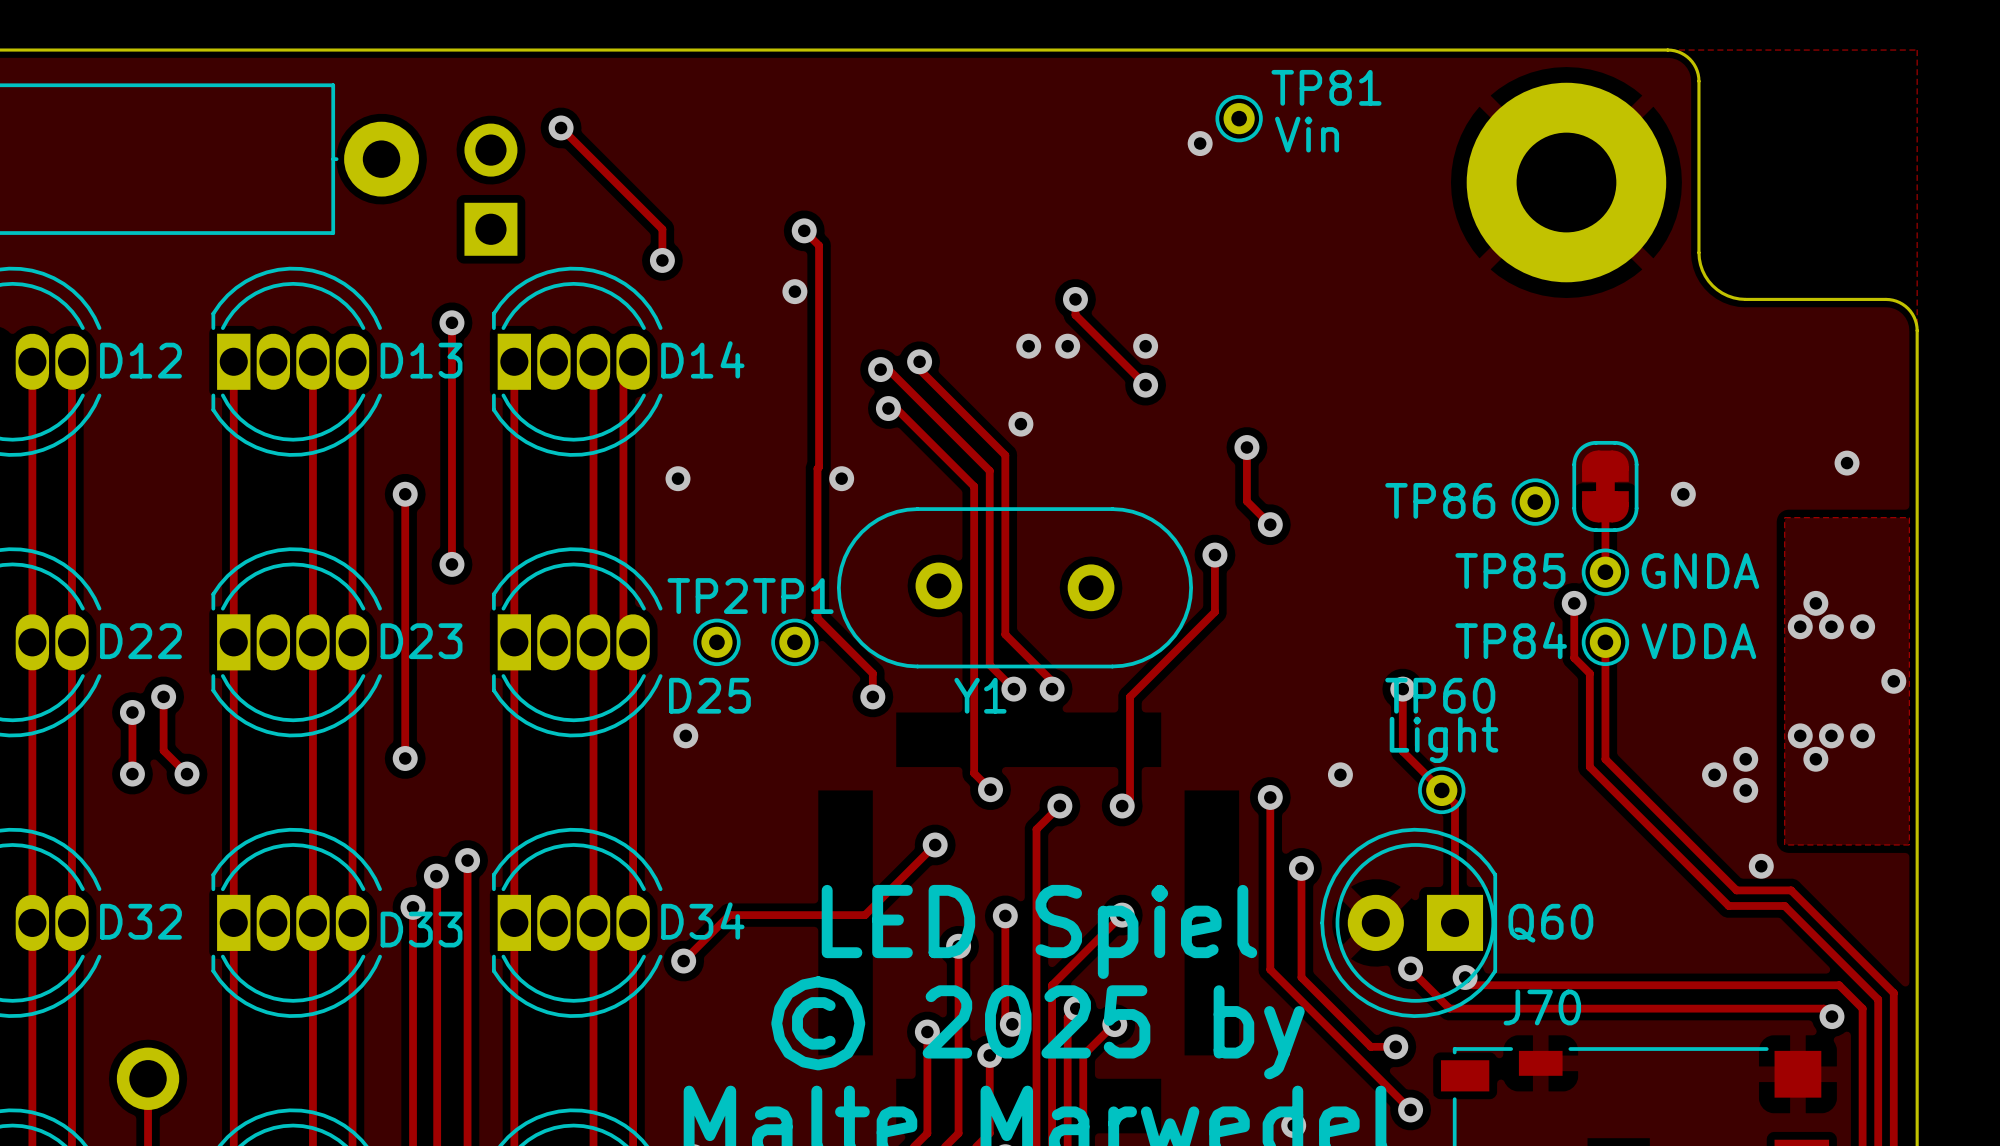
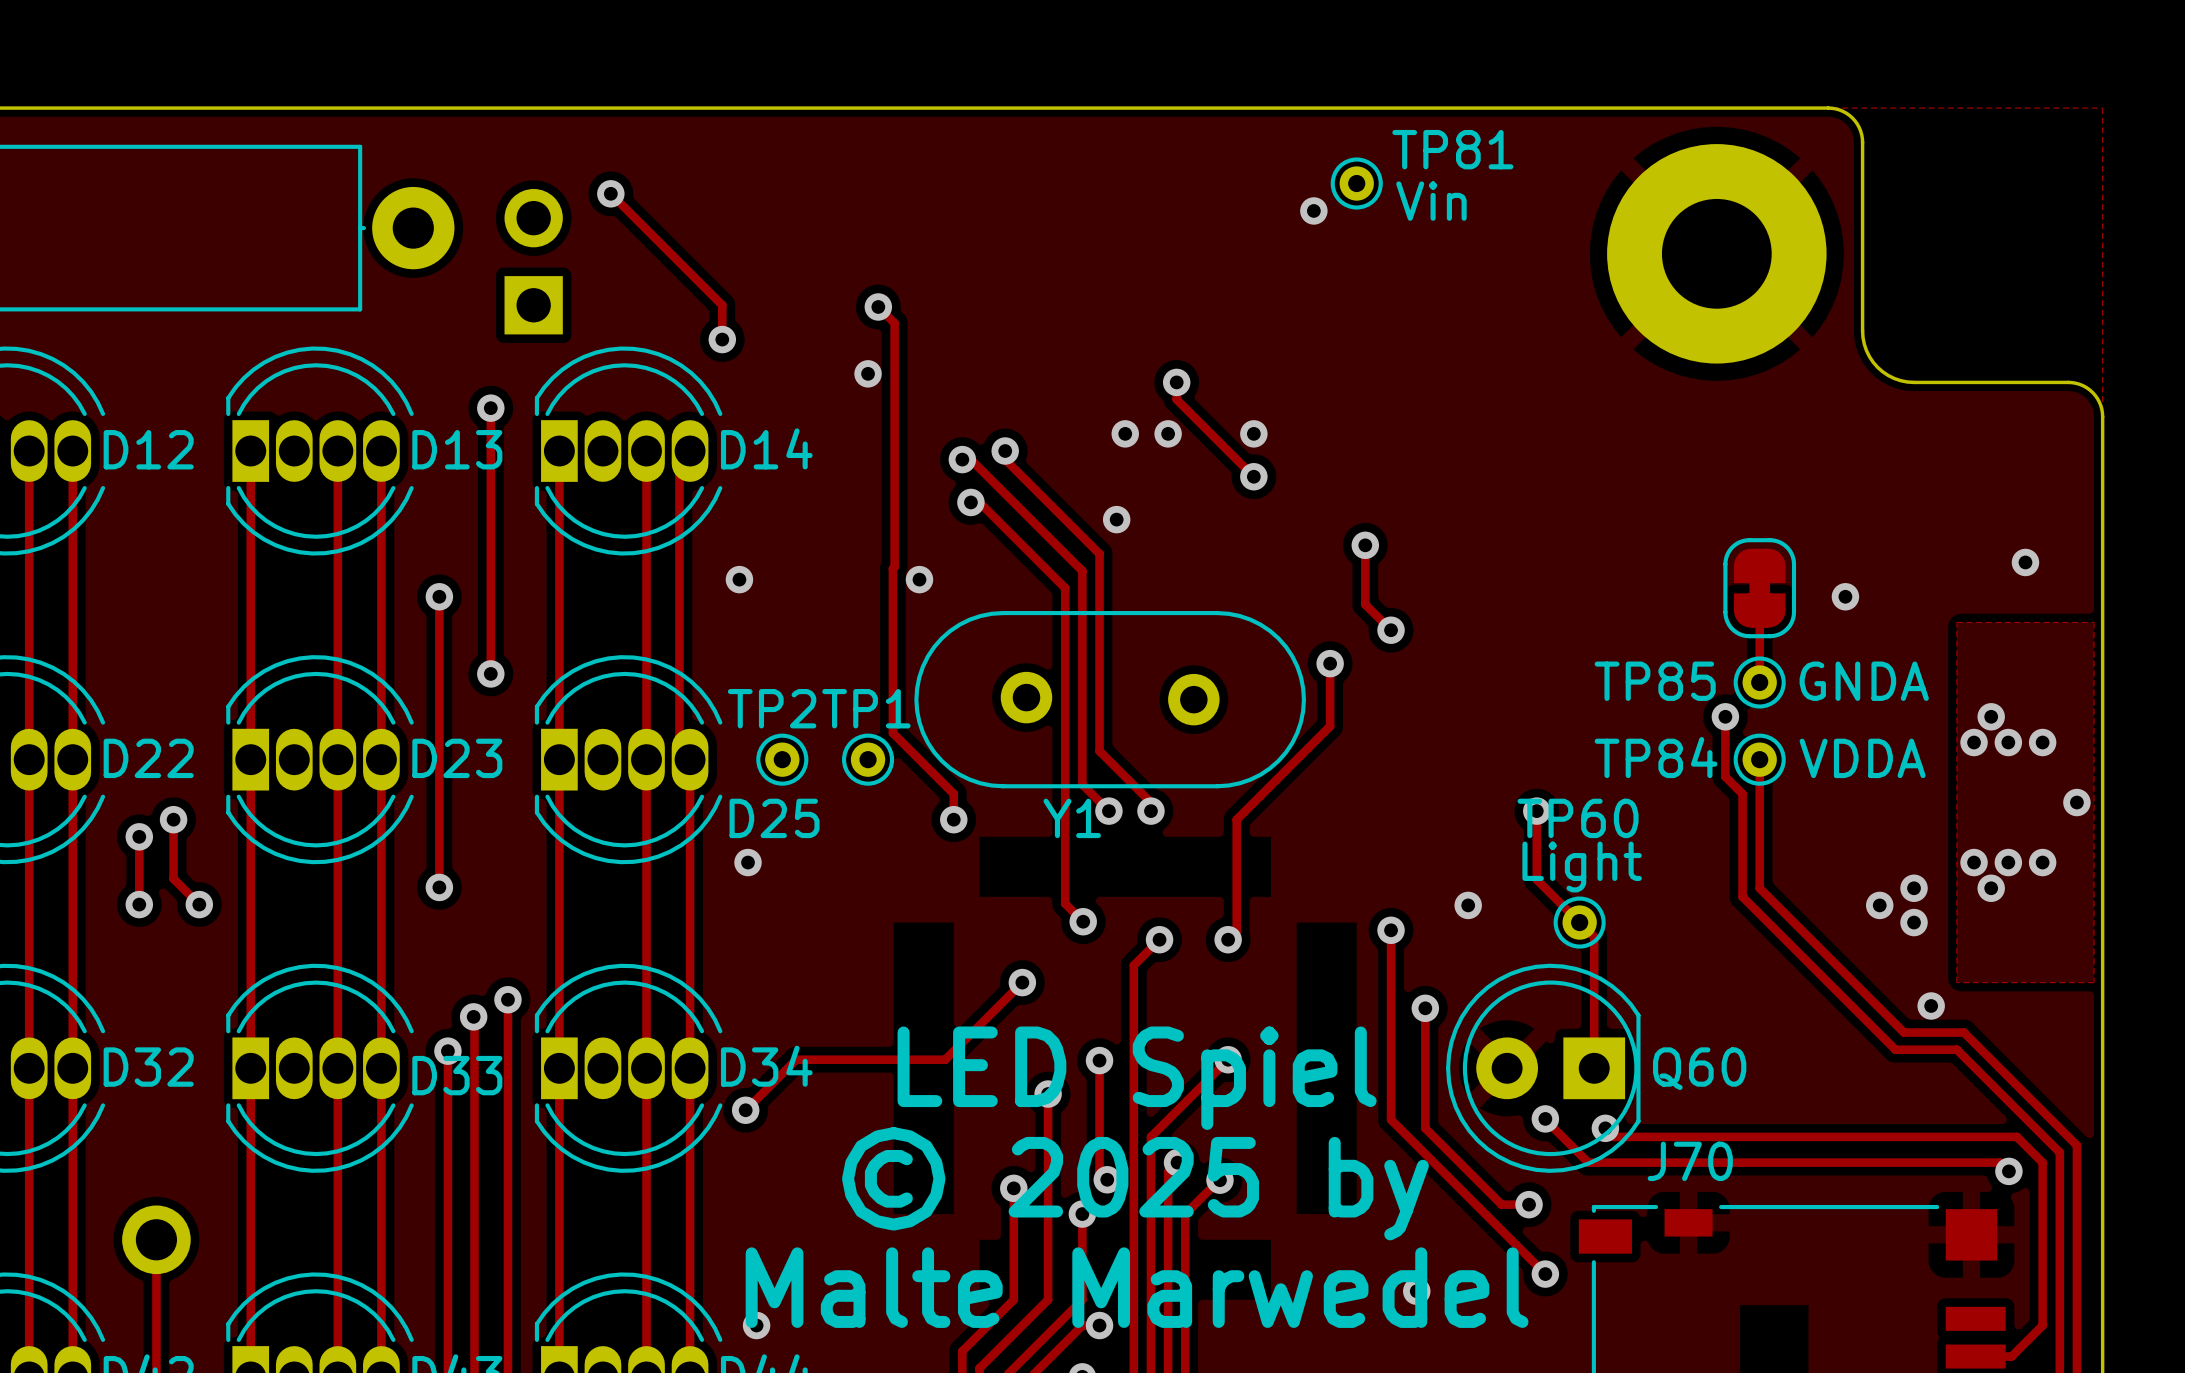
TP86: (1535, 502) -> none

